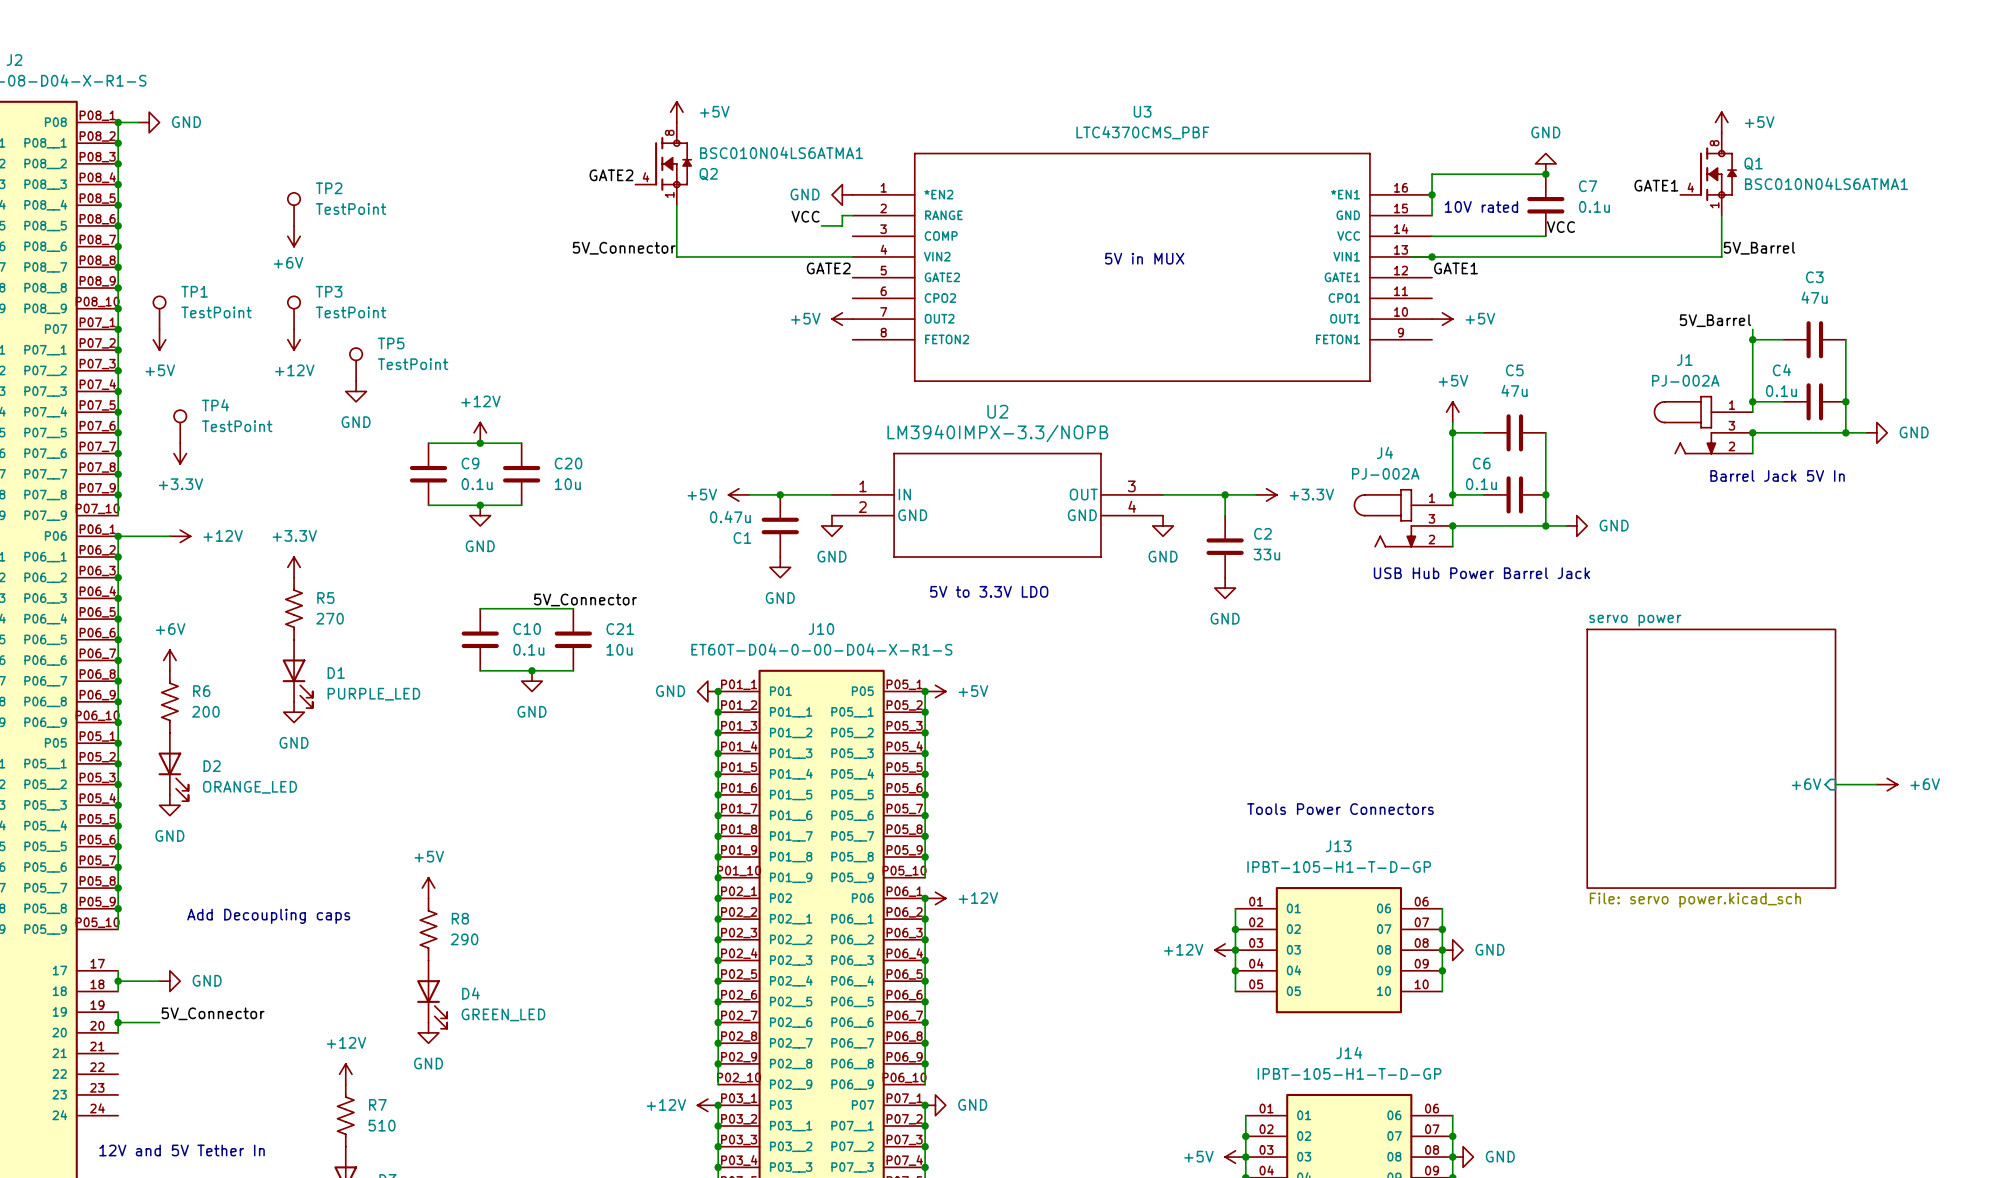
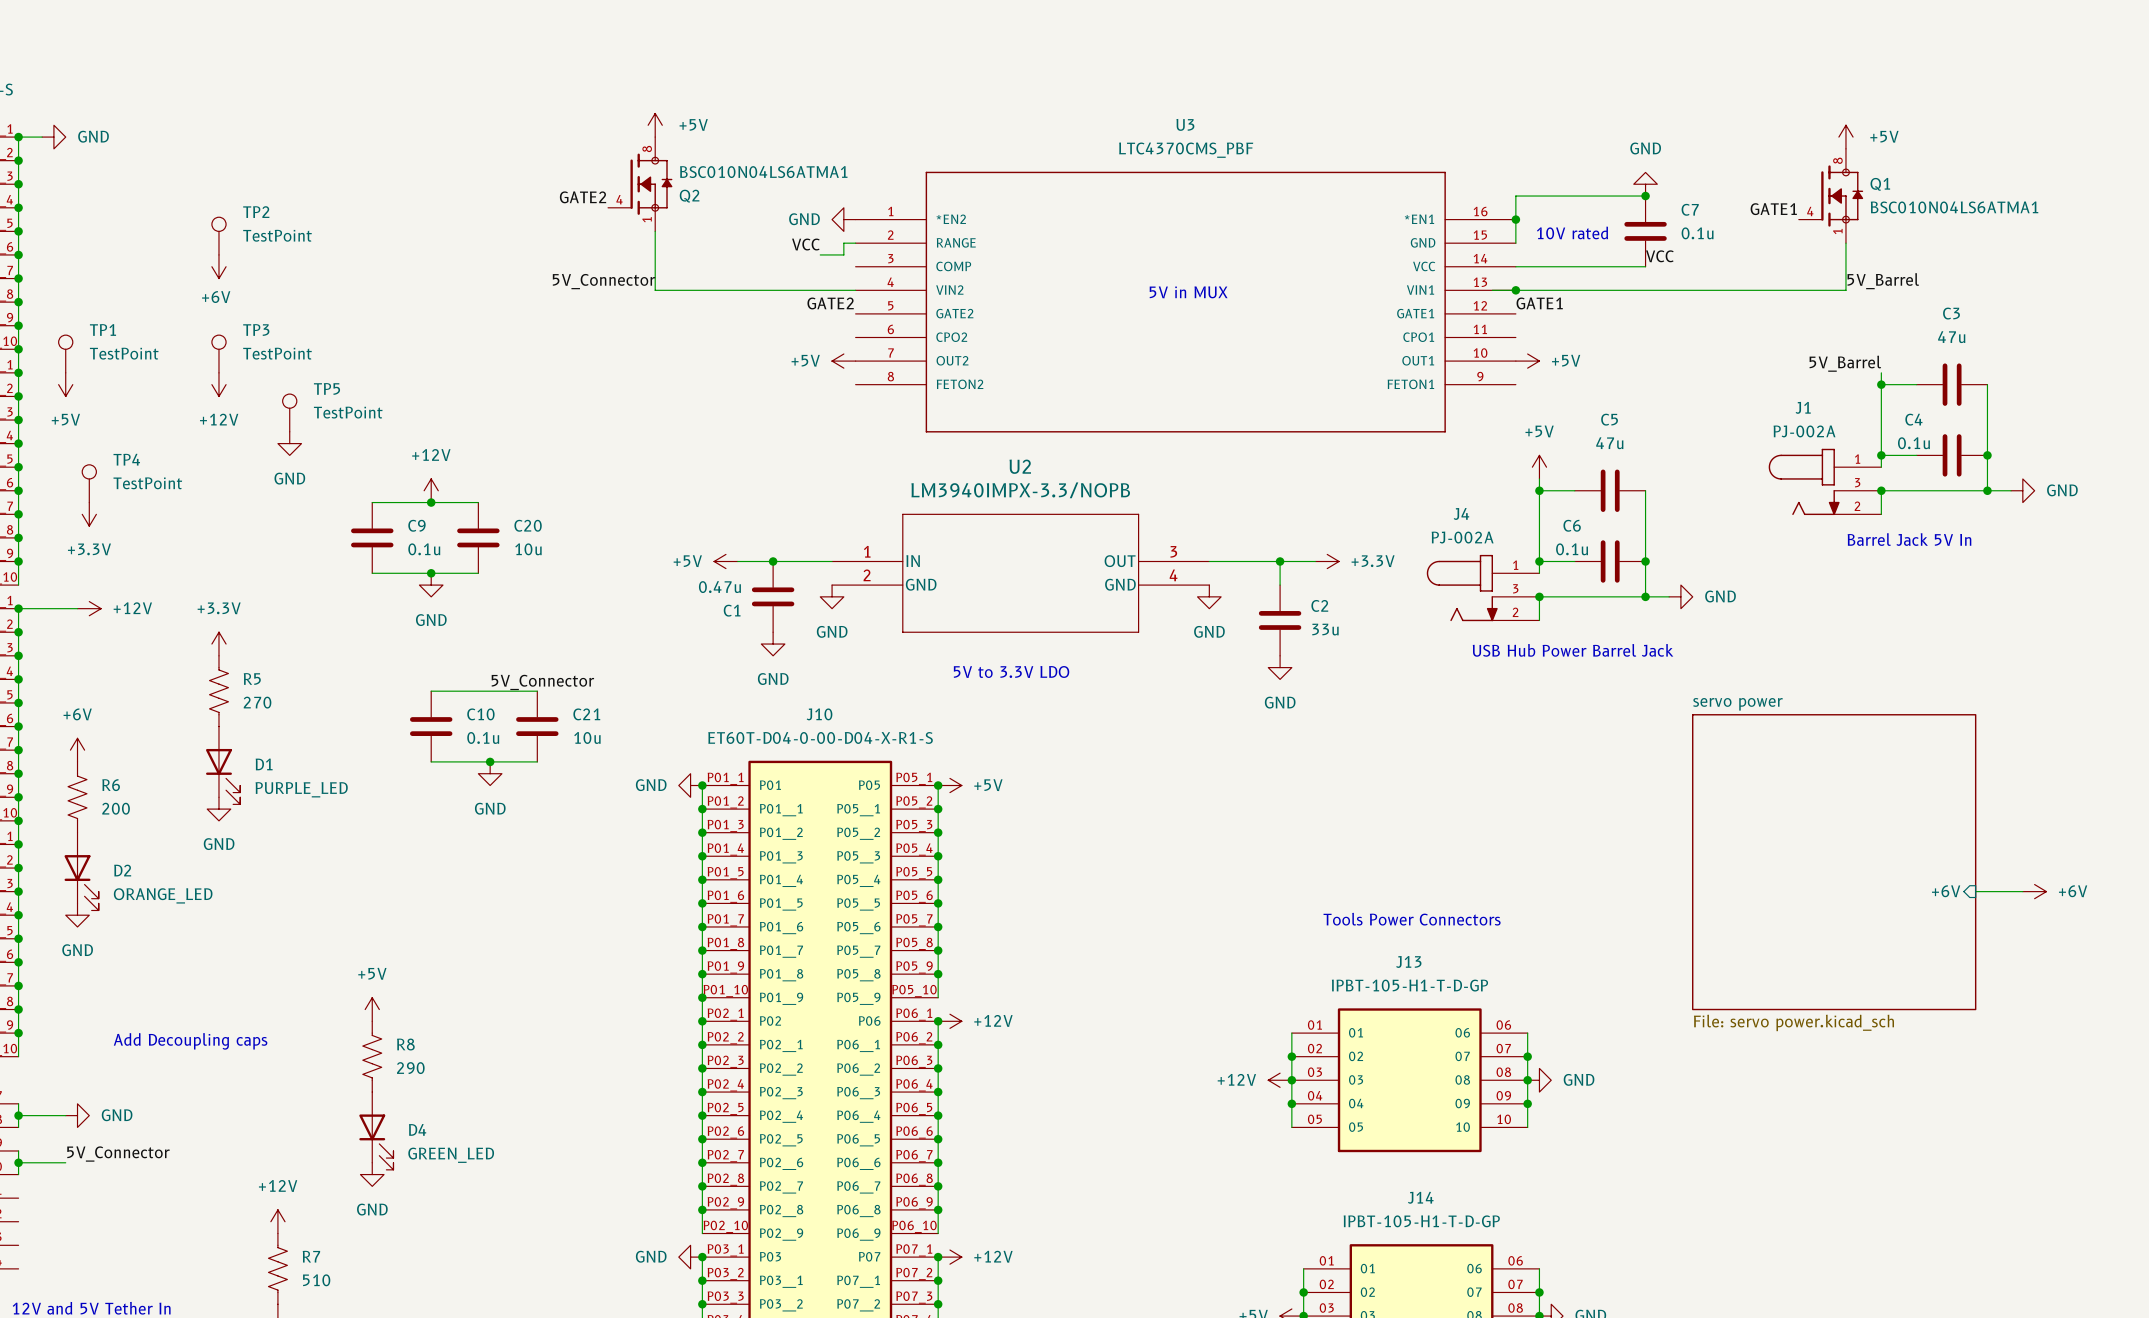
power symbol: +12V (707, 1105) -> GND (690, 1257)
power symbol: GND (935, 1105) -> +12V (949, 1257)

